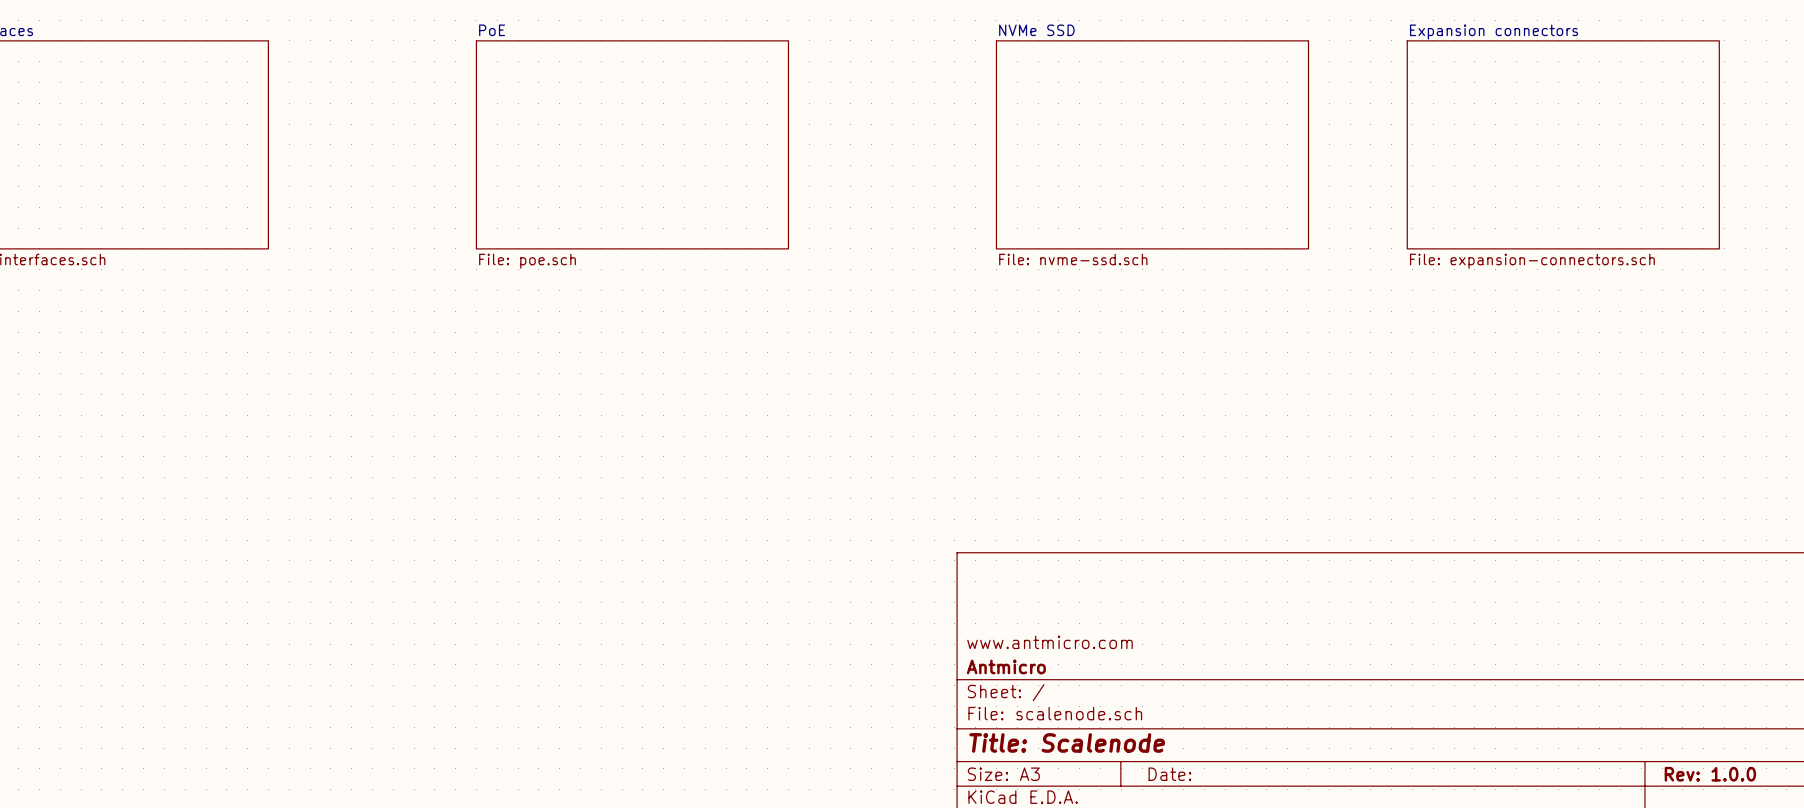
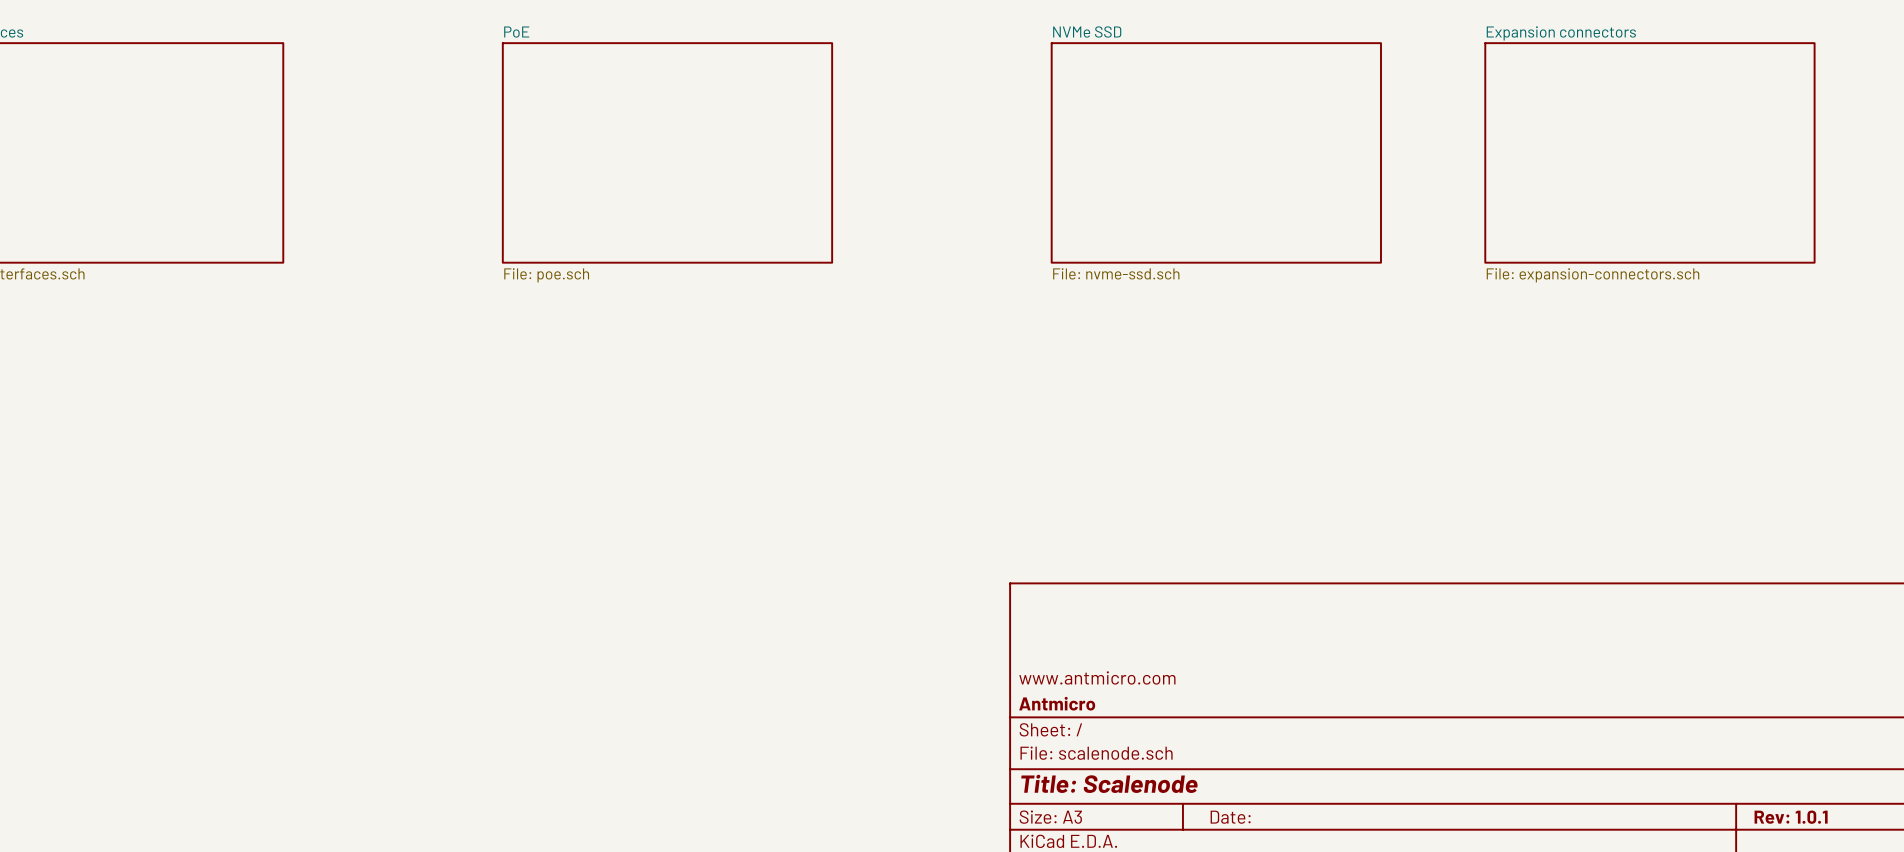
title block: Rev: 1.0.0 (1710, 774) -> Rev: 1.0.1 (1791, 817)

